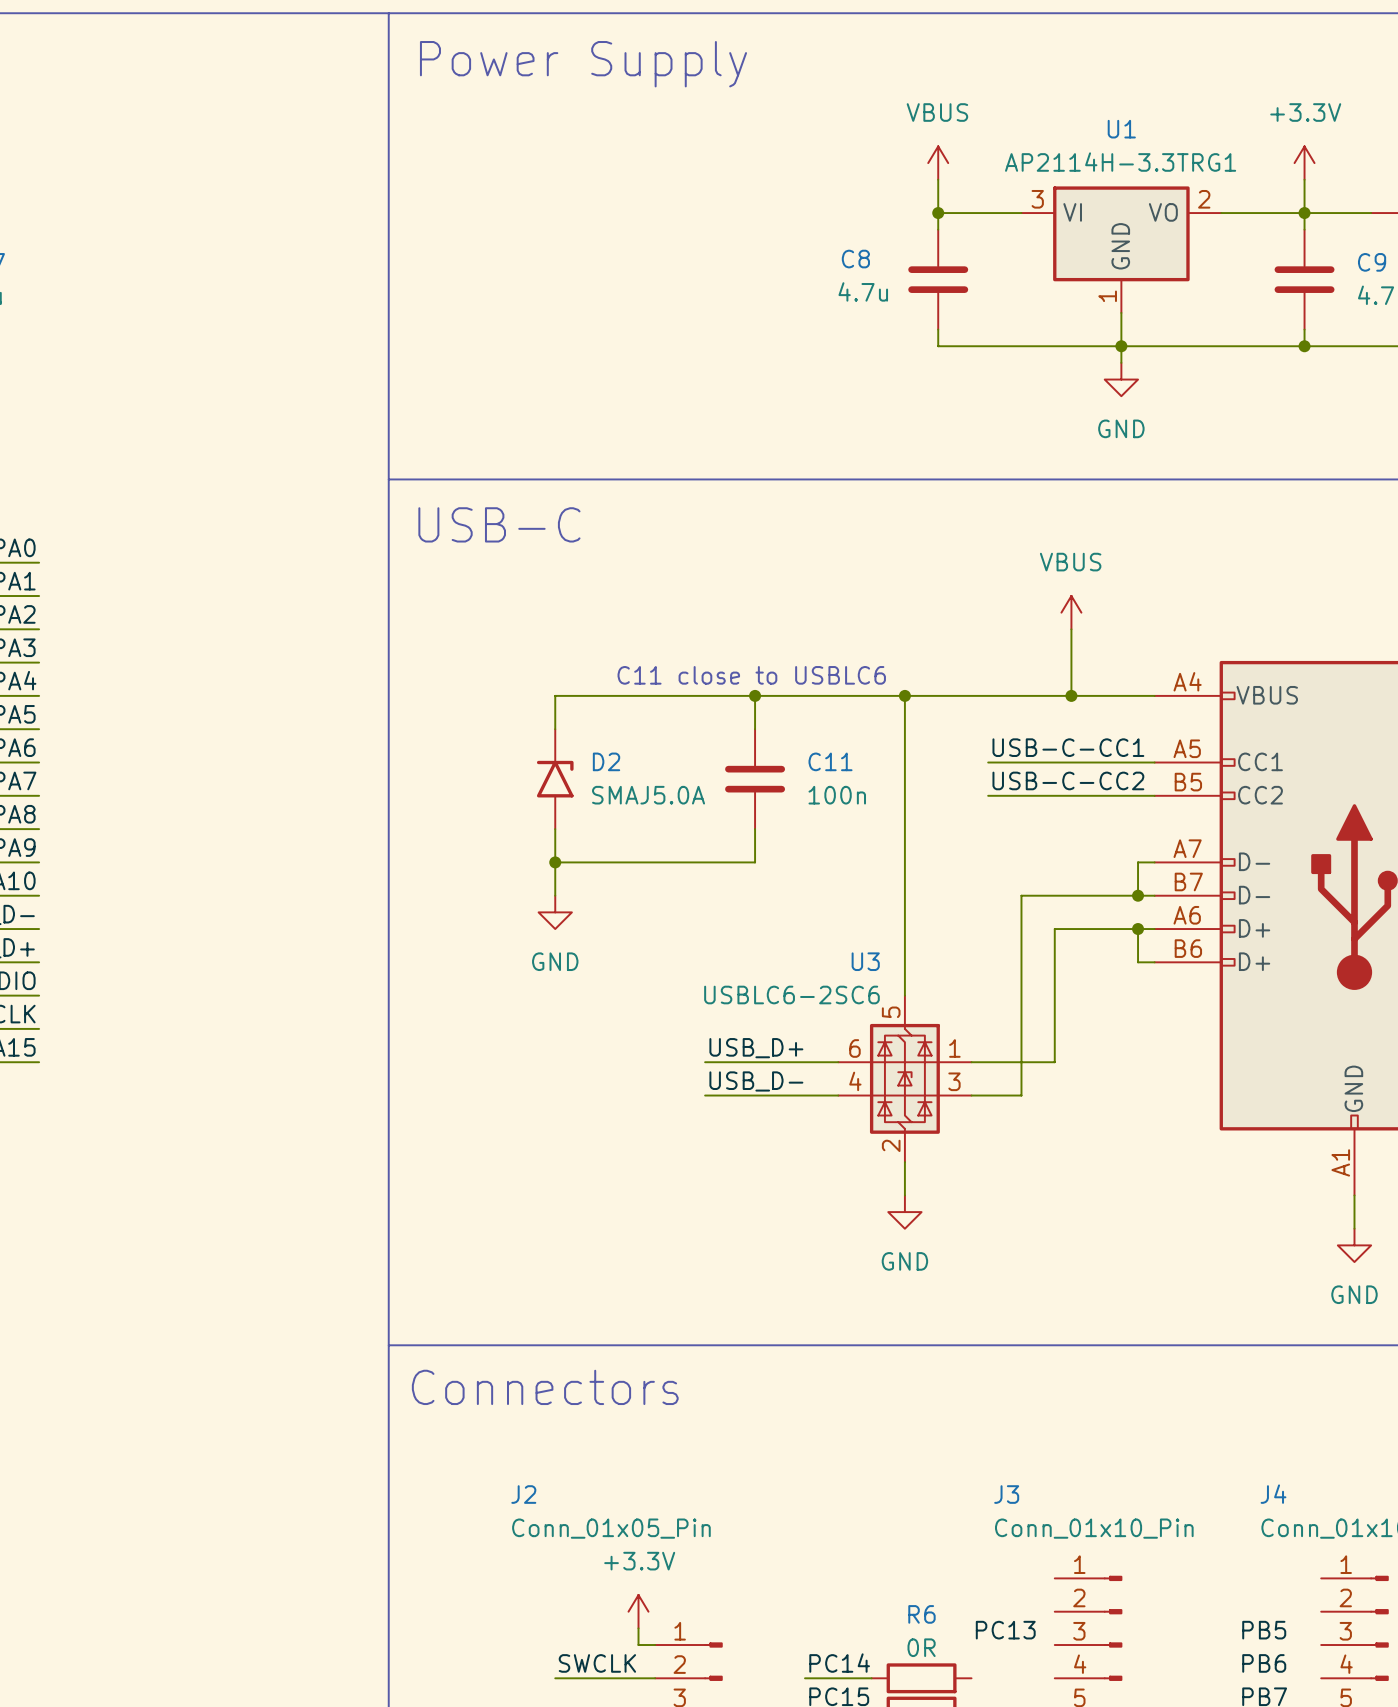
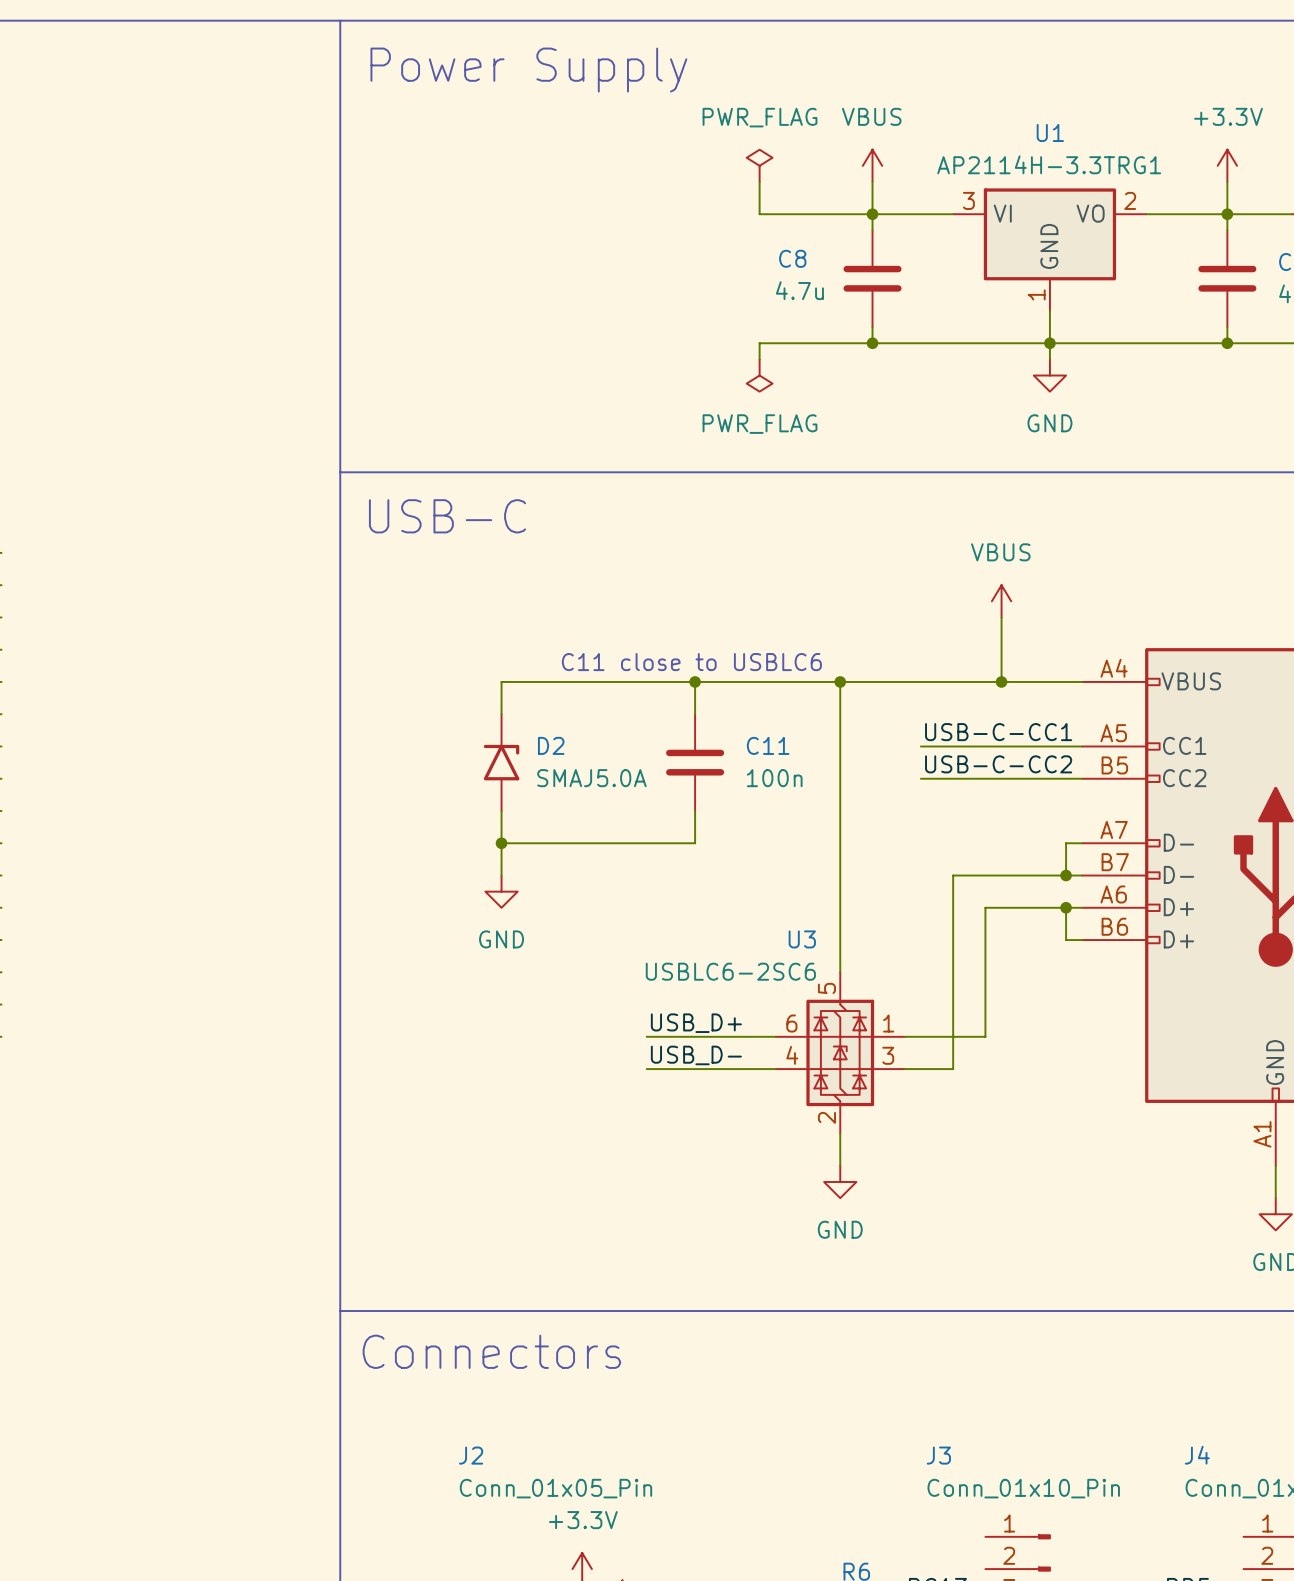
power symbol: none -> PWR_FLAG (759, 165)
wire: none -> (759, 181) (759, 214) (872, 214)
wire: none -> (872, 343) (759, 343) (759, 359)
junction: none -> (872, 343)
power symbol: none -> PWR_FLAG (759, 375)

